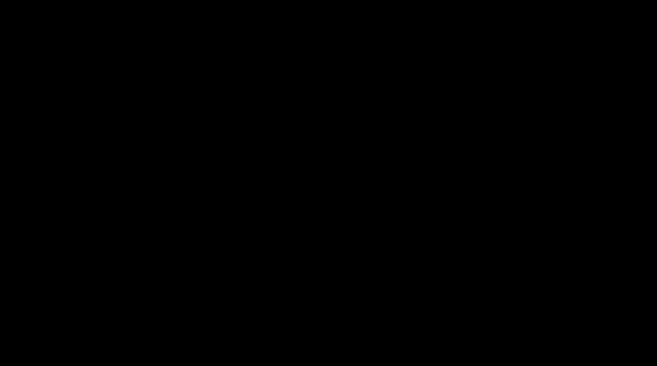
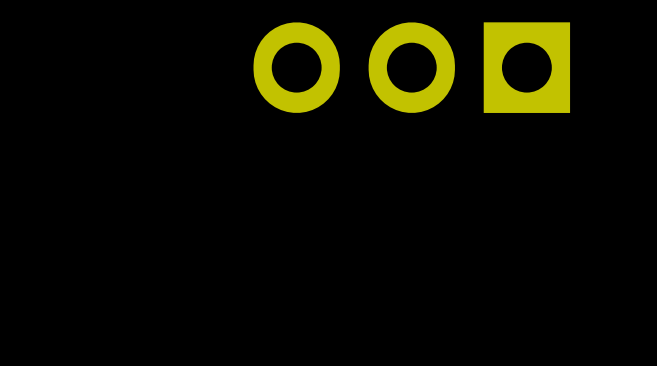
part: none -> (411, 67)

